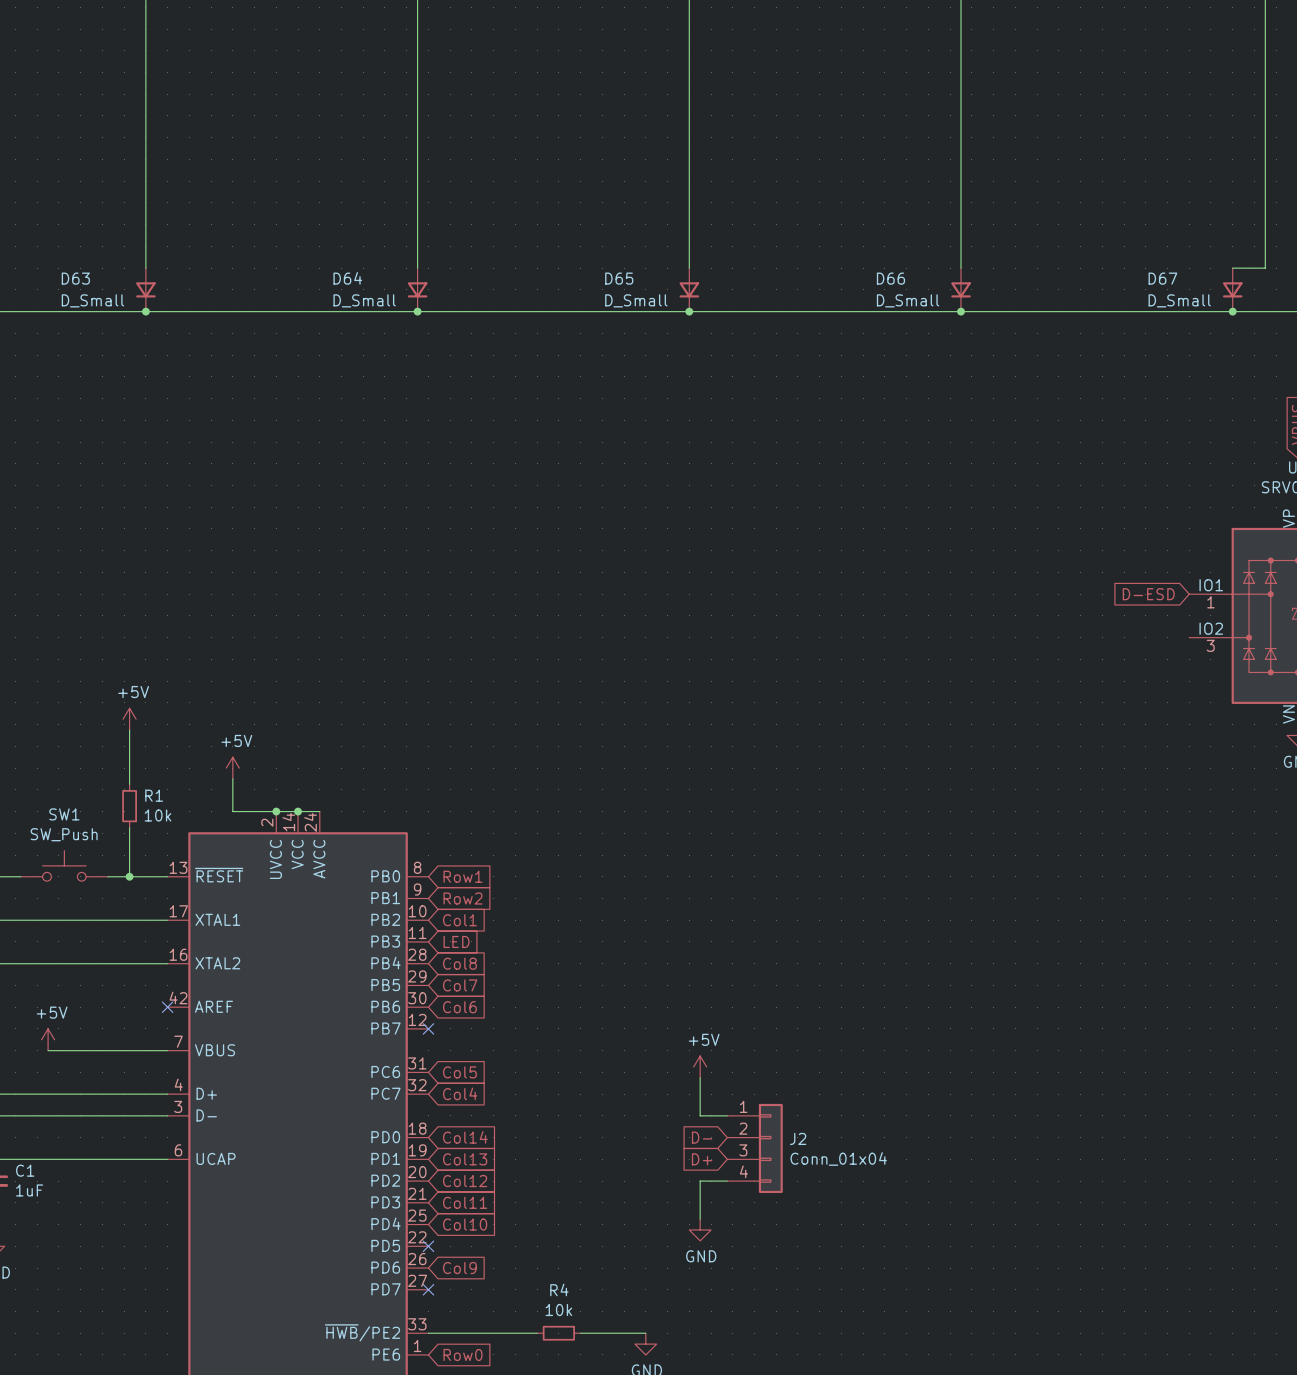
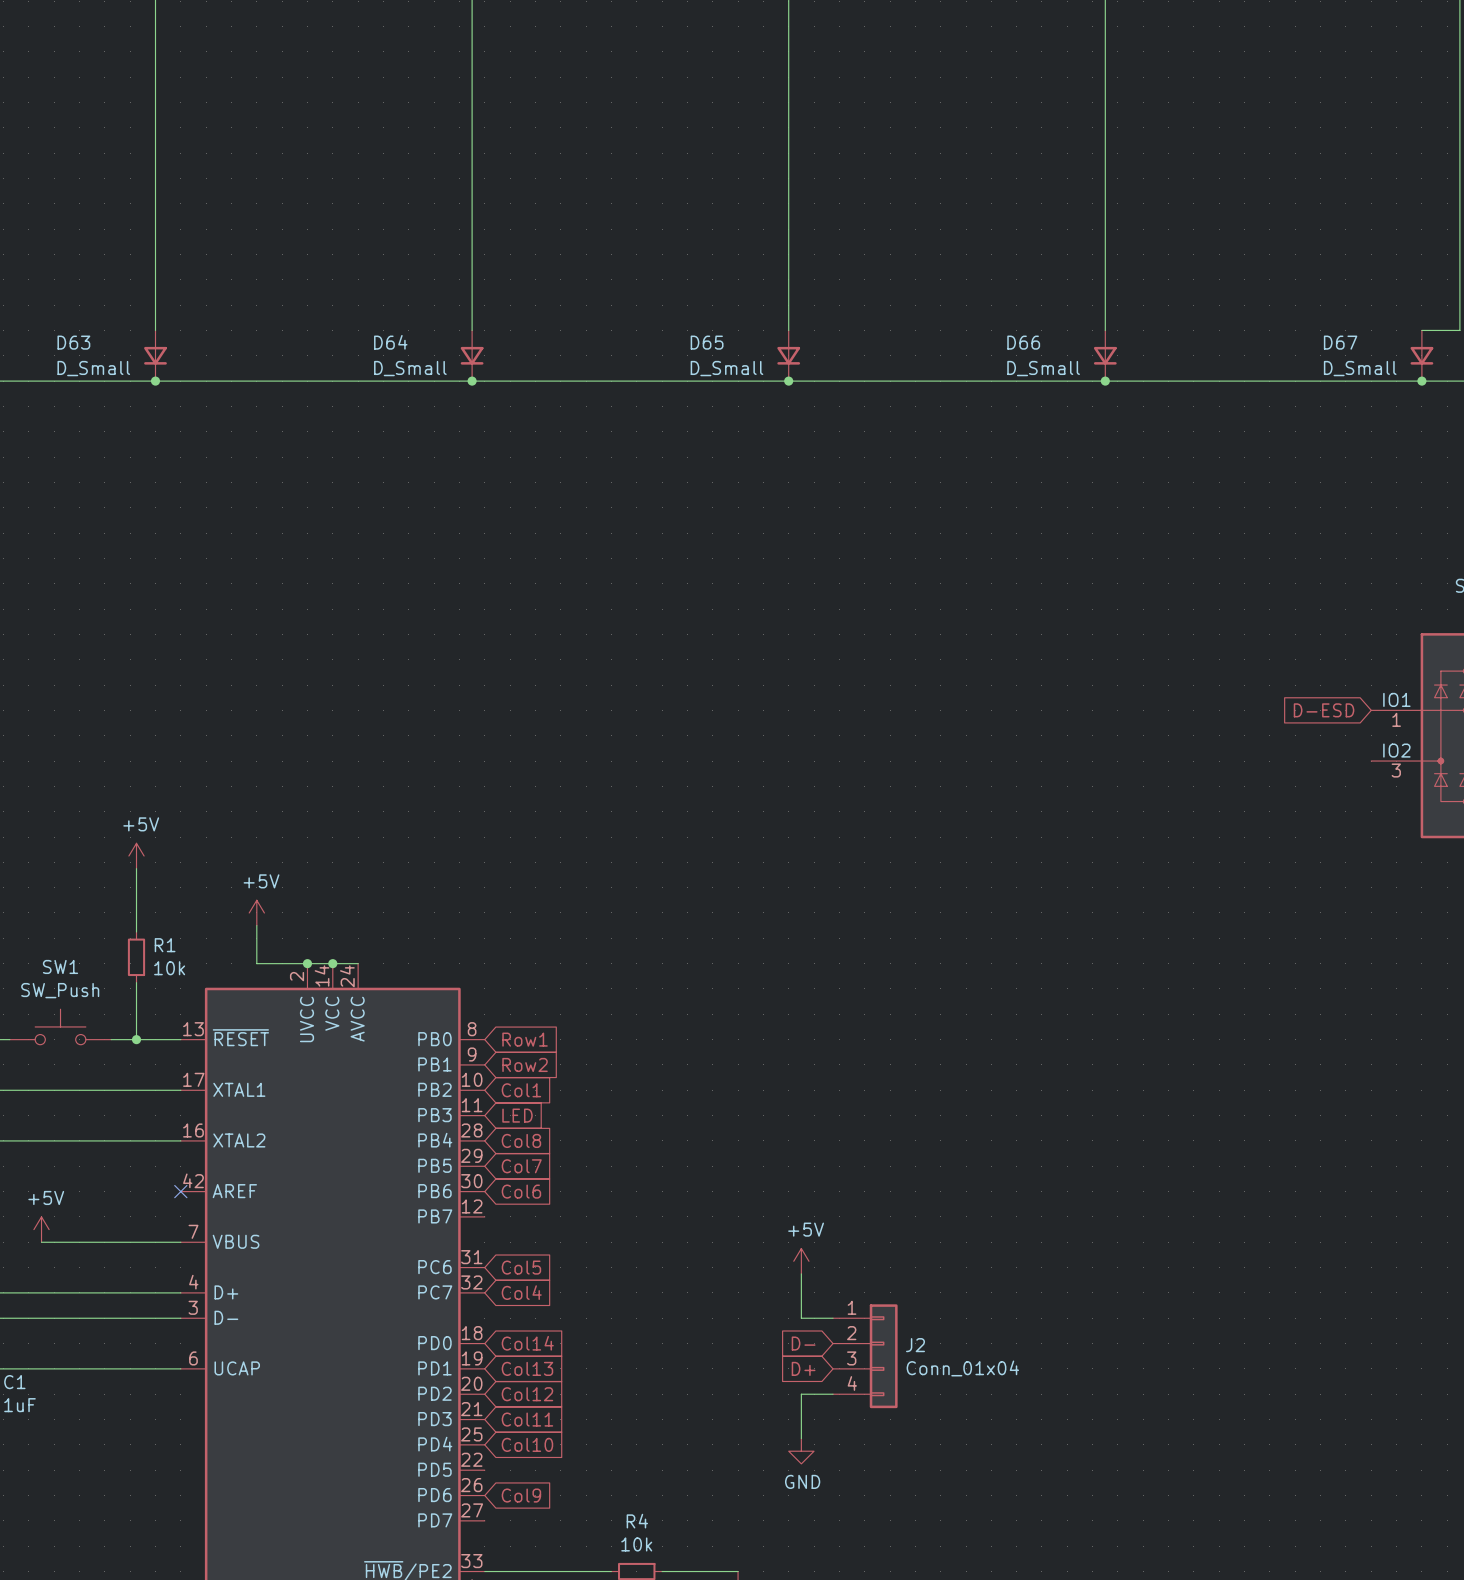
no-connect mark: (428, 1028) -> none
no-connect mark: (428, 1246) -> none
no-connect mark: (428, 1289) -> none

